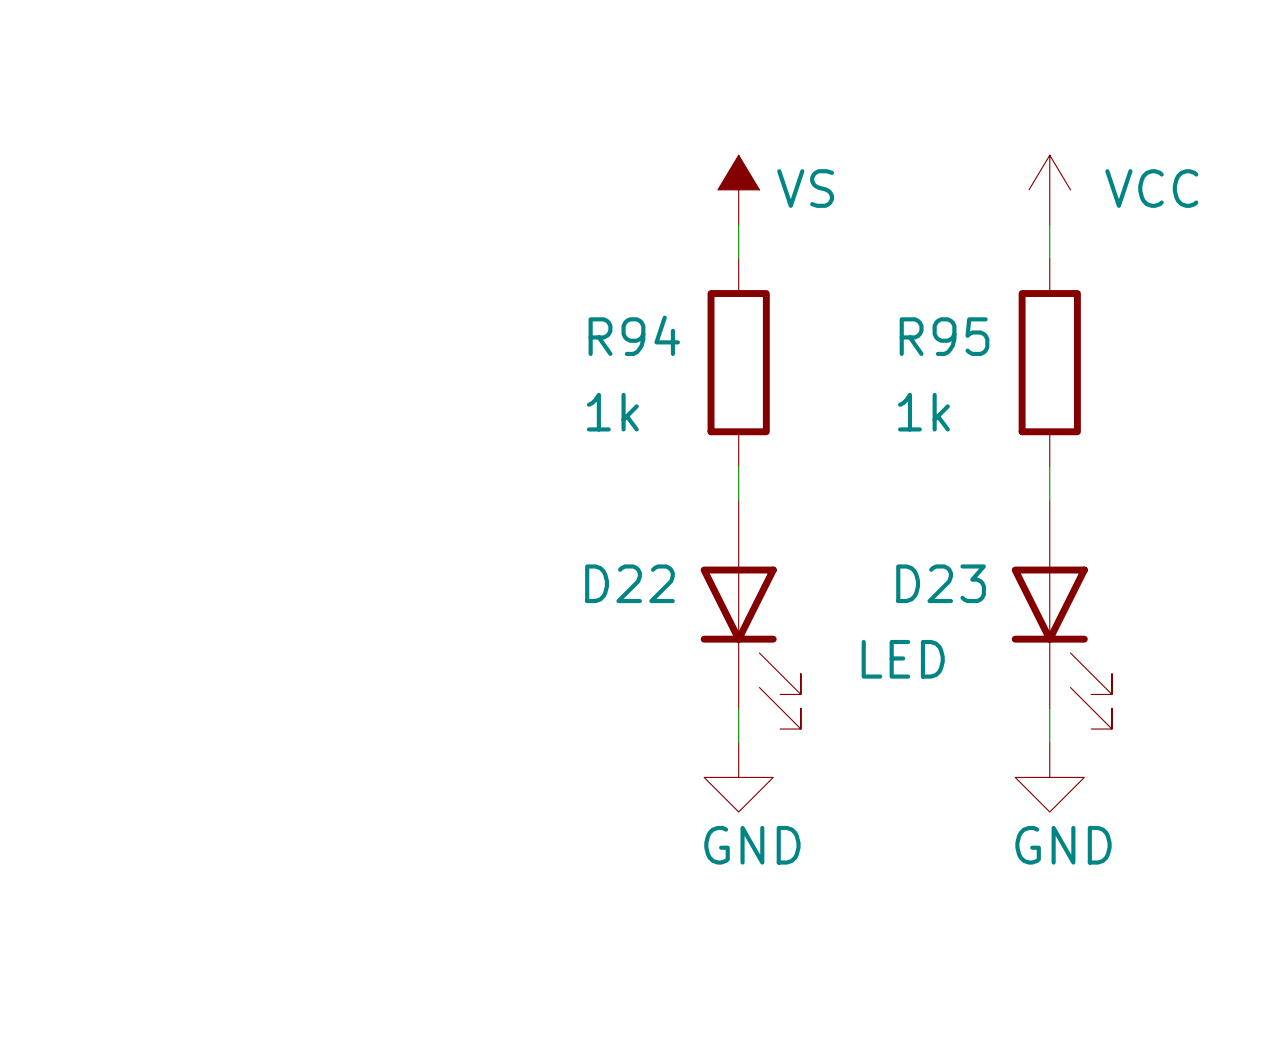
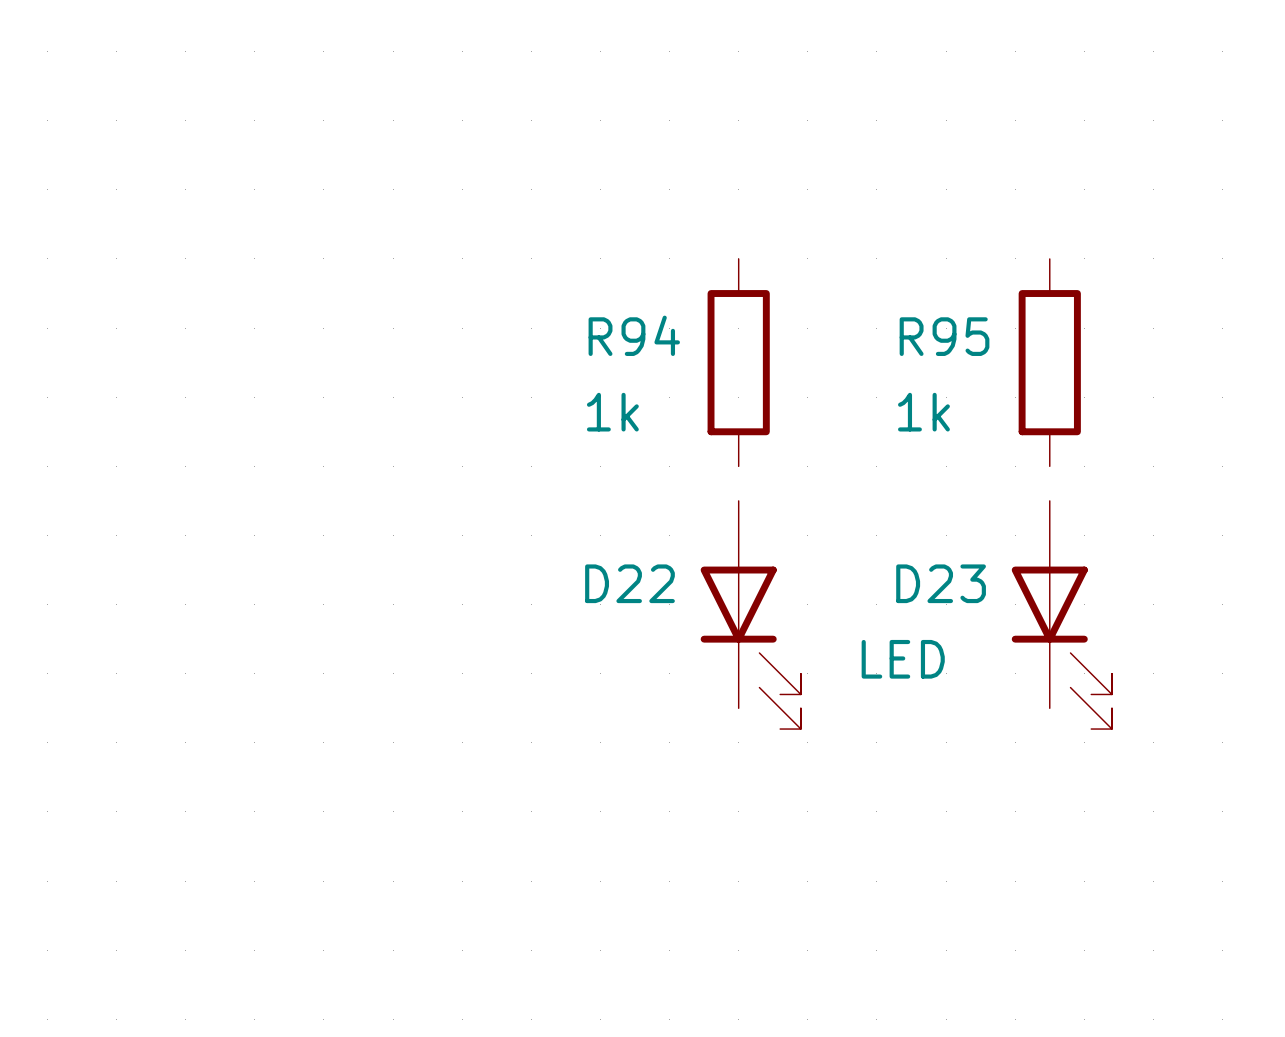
power symbol: VS (738, 189) -> none
power symbol: VCC (1049, 189) -> none
wire: (738, 224) (738, 258) -> none
wire: (1049, 224) (1049, 258) -> none
wire: (738, 466) (738, 500) -> none
wire: (1049, 466) (1049, 500) -> none
wire: (738, 708) (738, 742) -> none
wire: (1049, 708) (1049, 742) -> none
power symbol: GND (738, 777) -> none
power symbol: GND (1049, 777) -> none

